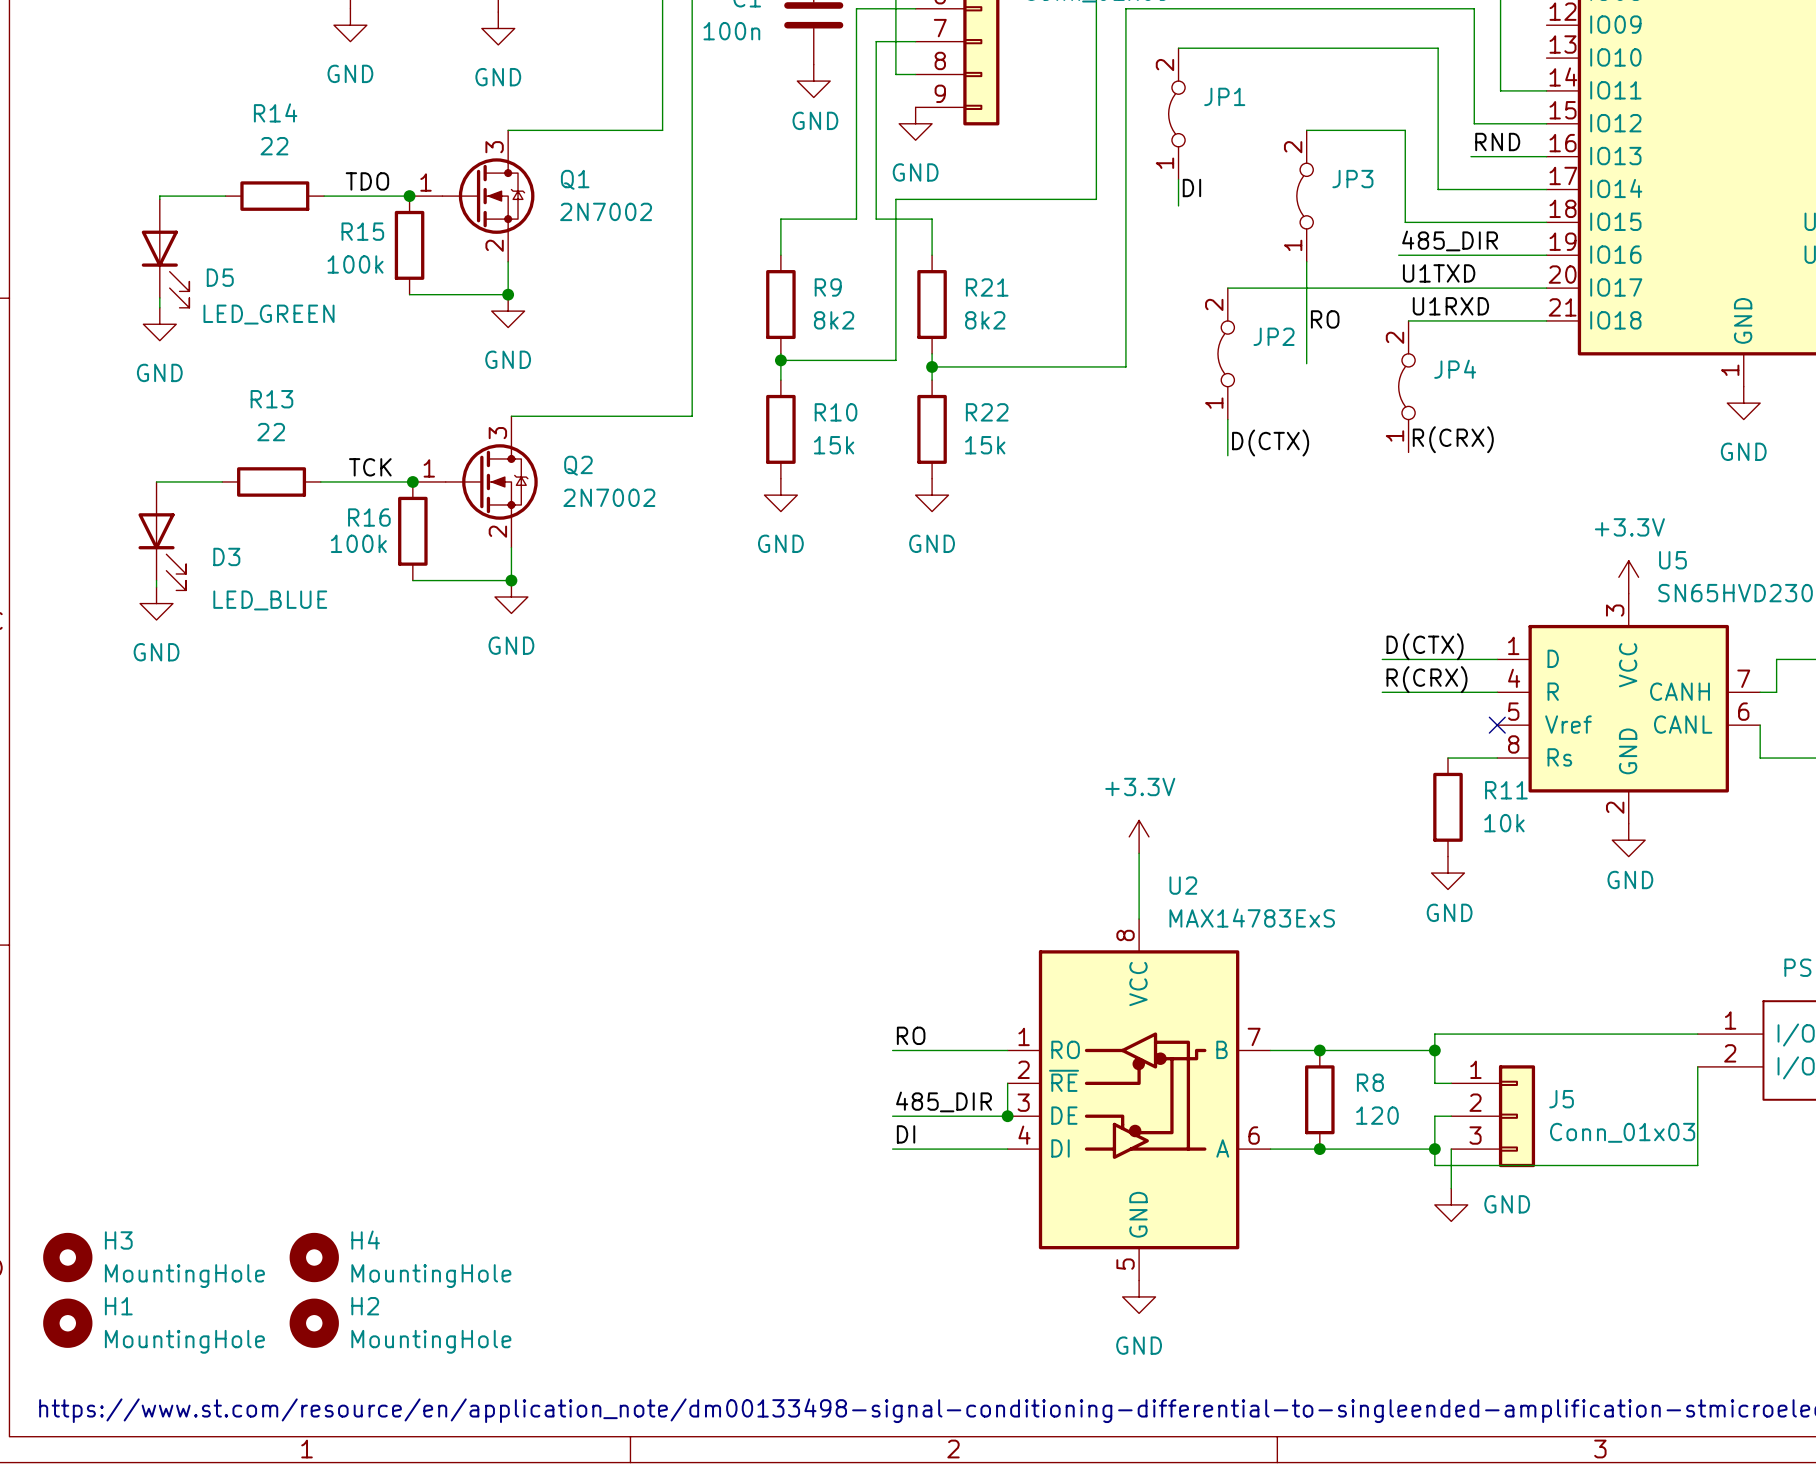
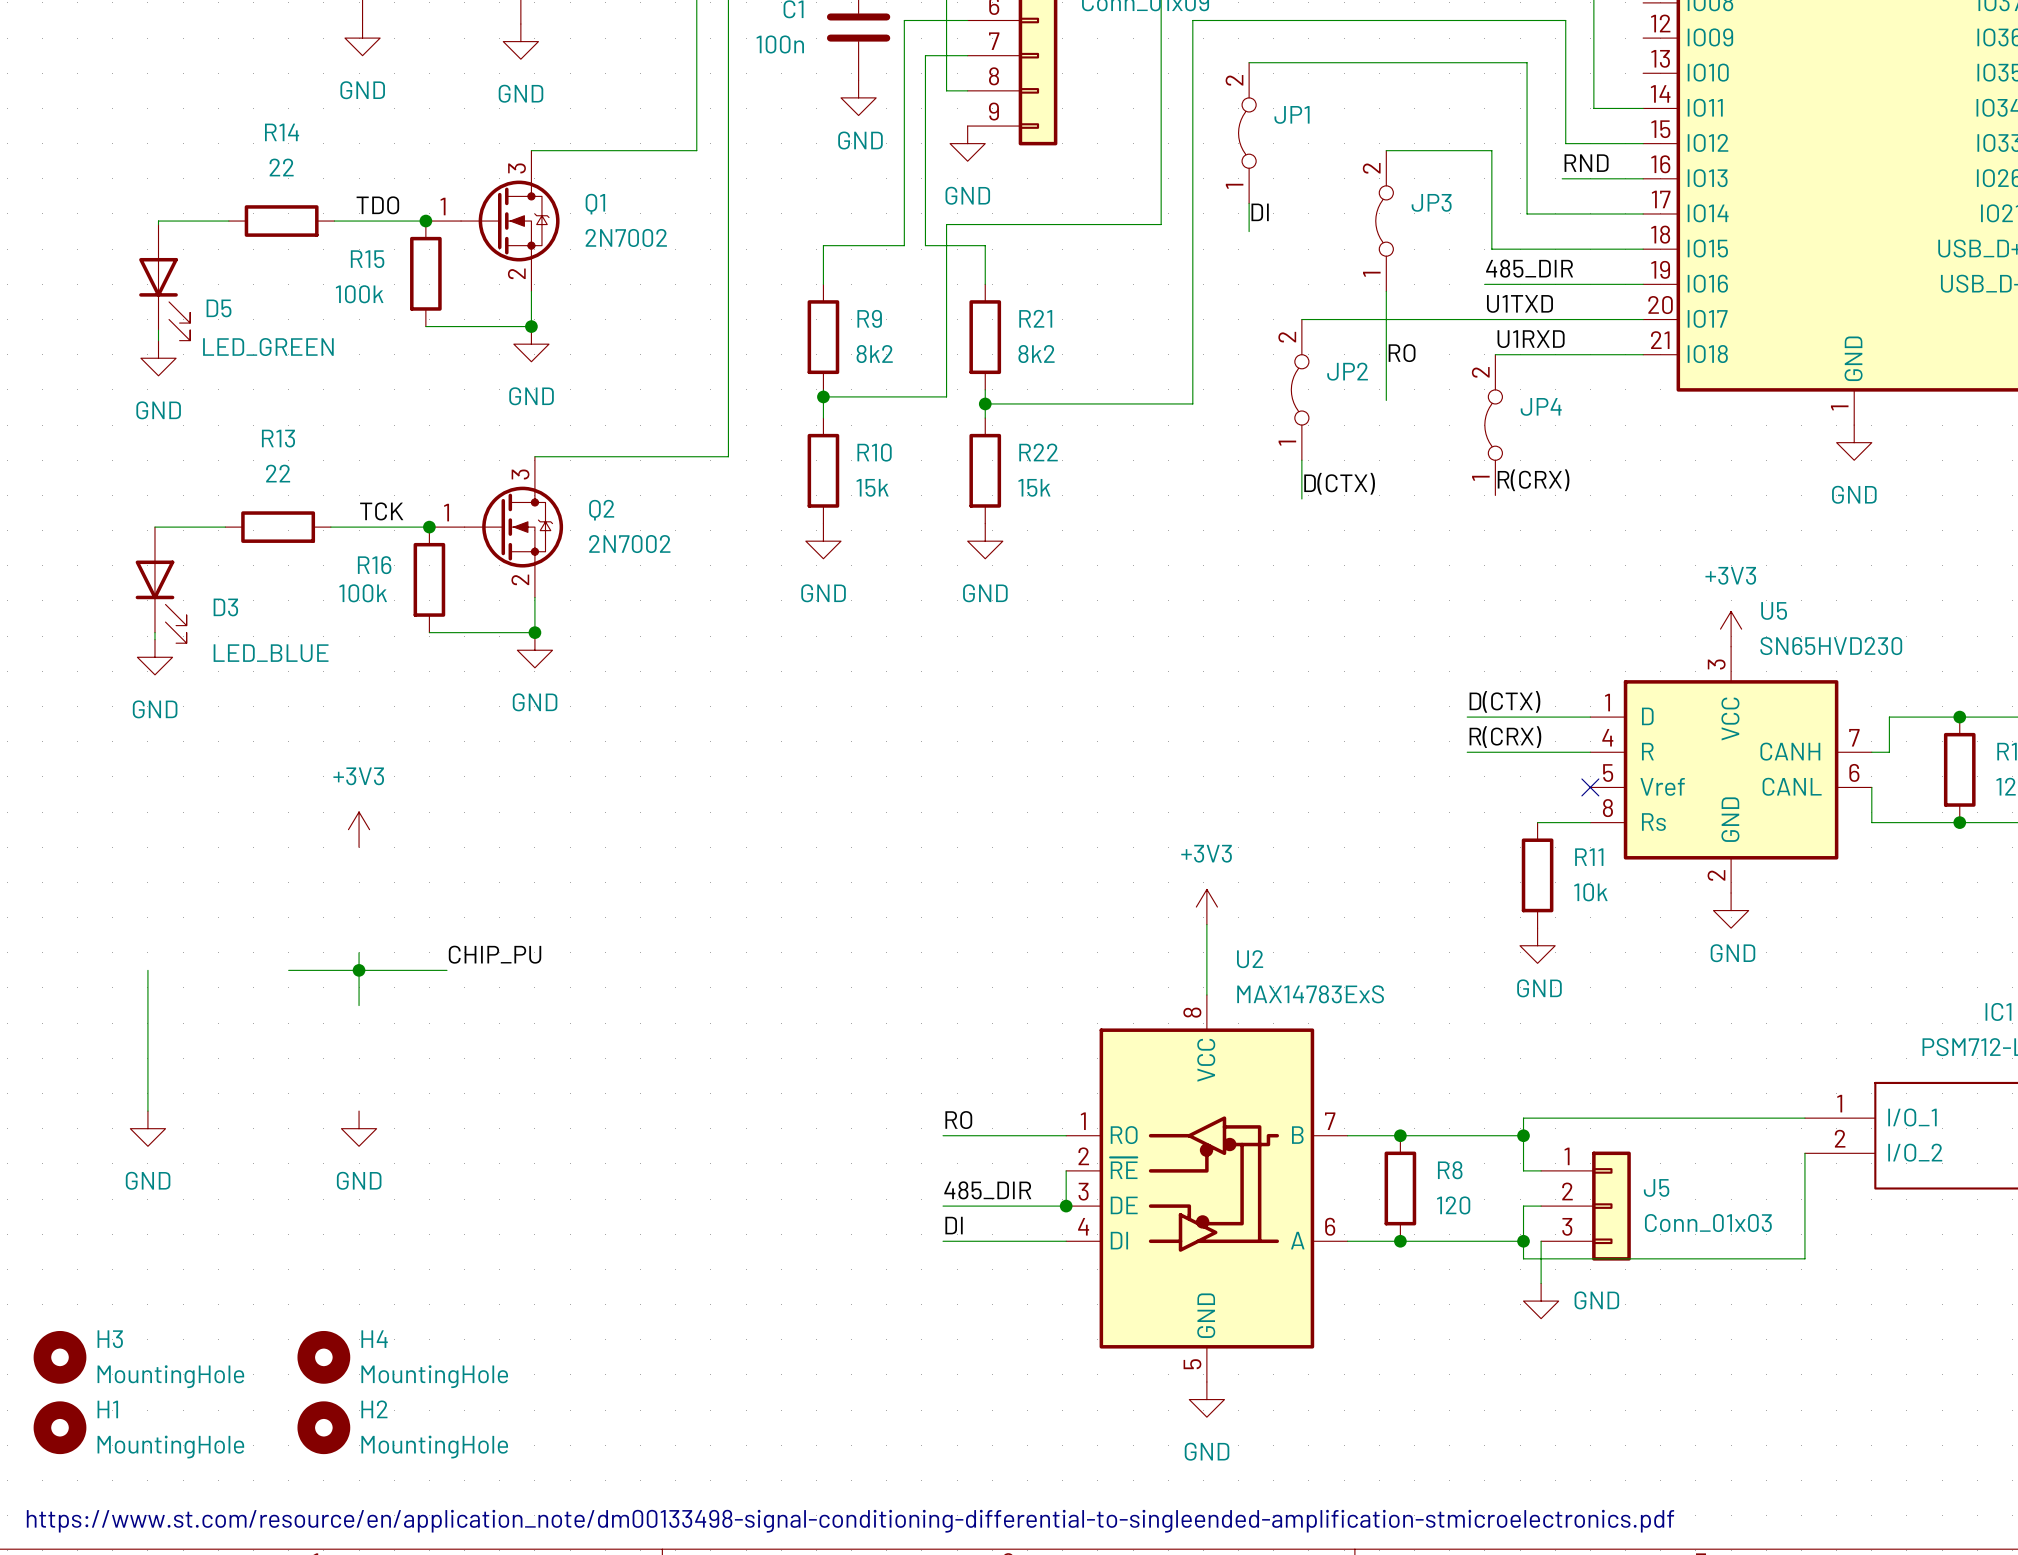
power symbol: +3.3V (1628, 577) -> +3V3 (1731, 629)
power symbol: none -> +3V3 (359, 829)
power symbol: +3.3V (1139, 836) -> +3V3 (1206, 907)
wire: none -> (359, 952) (359, 1005)
label: none -> CHIP_PU (495, 954)
wire: none -> (147, 970) (147, 1111)
wire: none -> (288, 970) (446, 970)
junction: none -> (359, 970)
power symbol: none -> GND (147, 1128)
power symbol: none -> GND (359, 1128)

